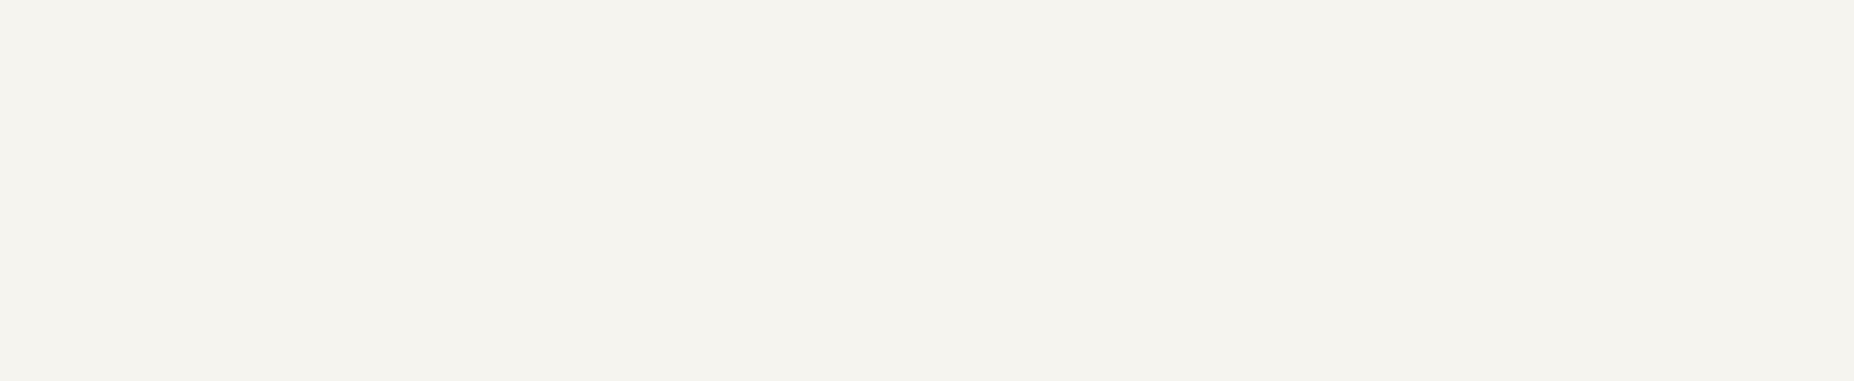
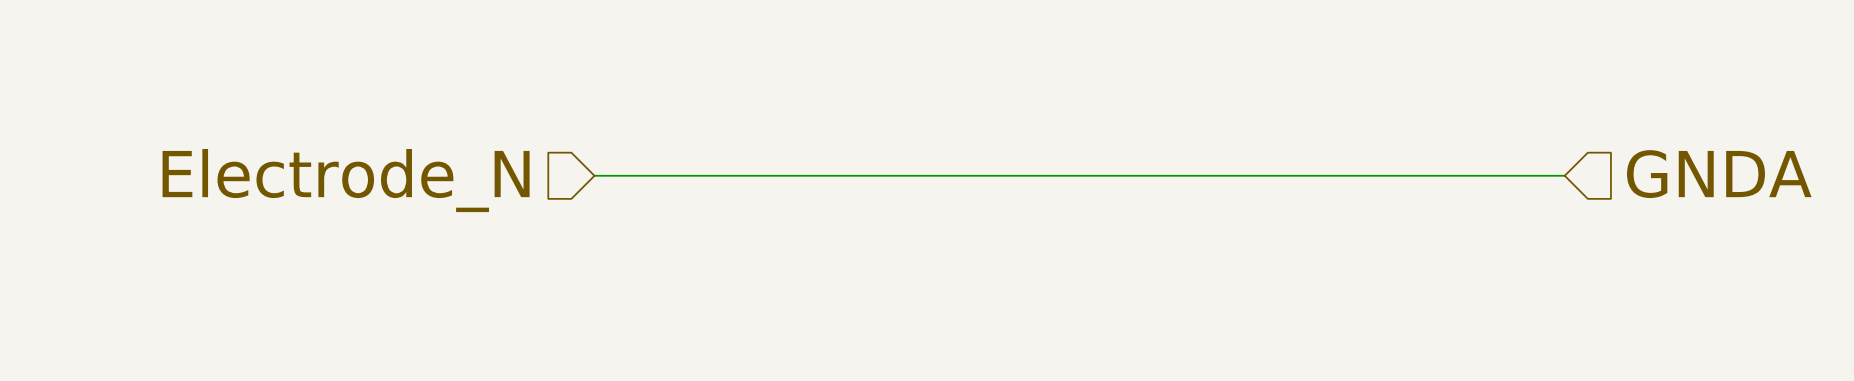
hierarchical label: none -> GNDA (1719, 174)
wire: none -> (594, 175) (1564, 175)
hierarchical label: none -> Electrode_N (346, 180)

